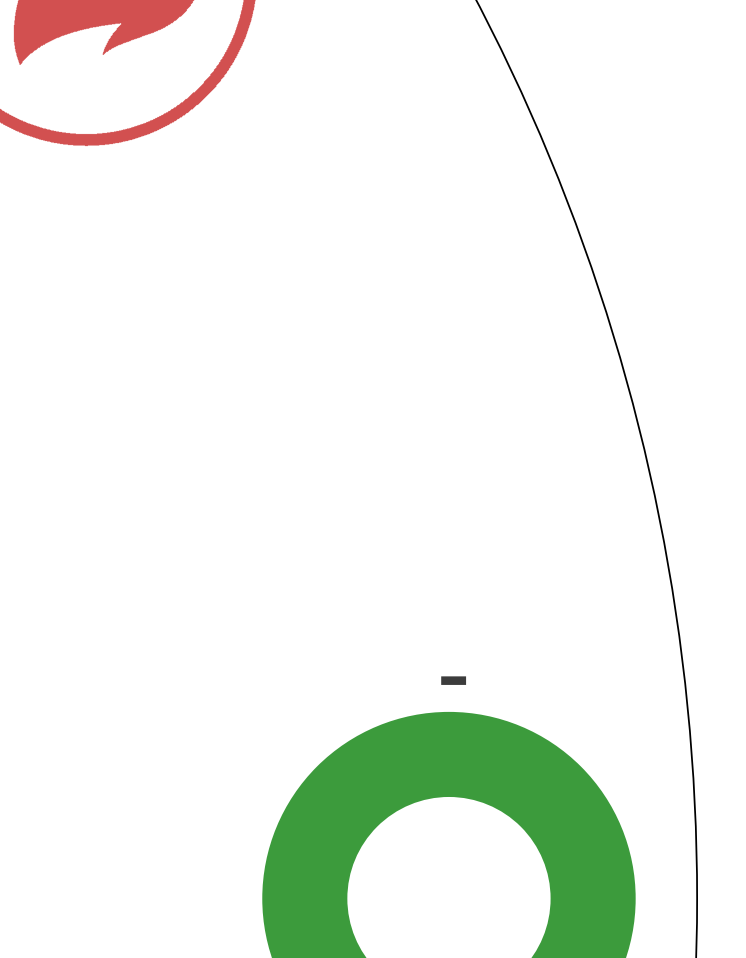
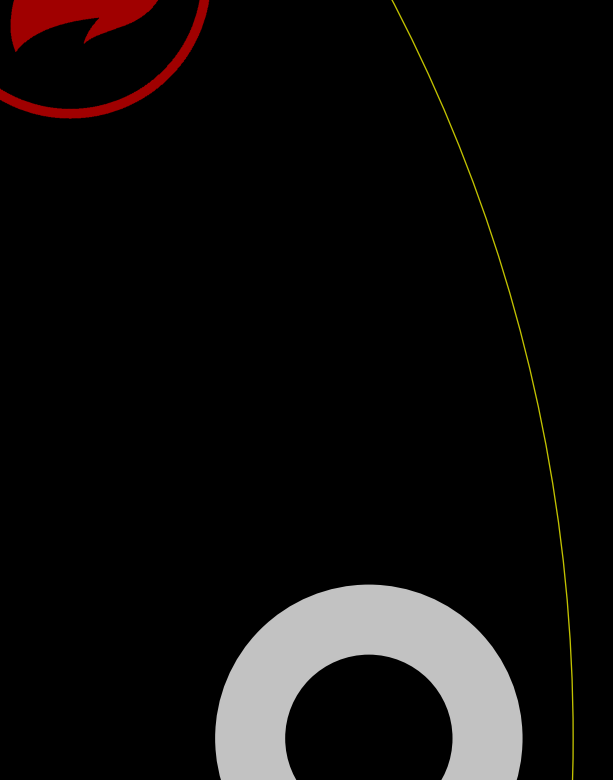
text: - (453, 680) -> none

